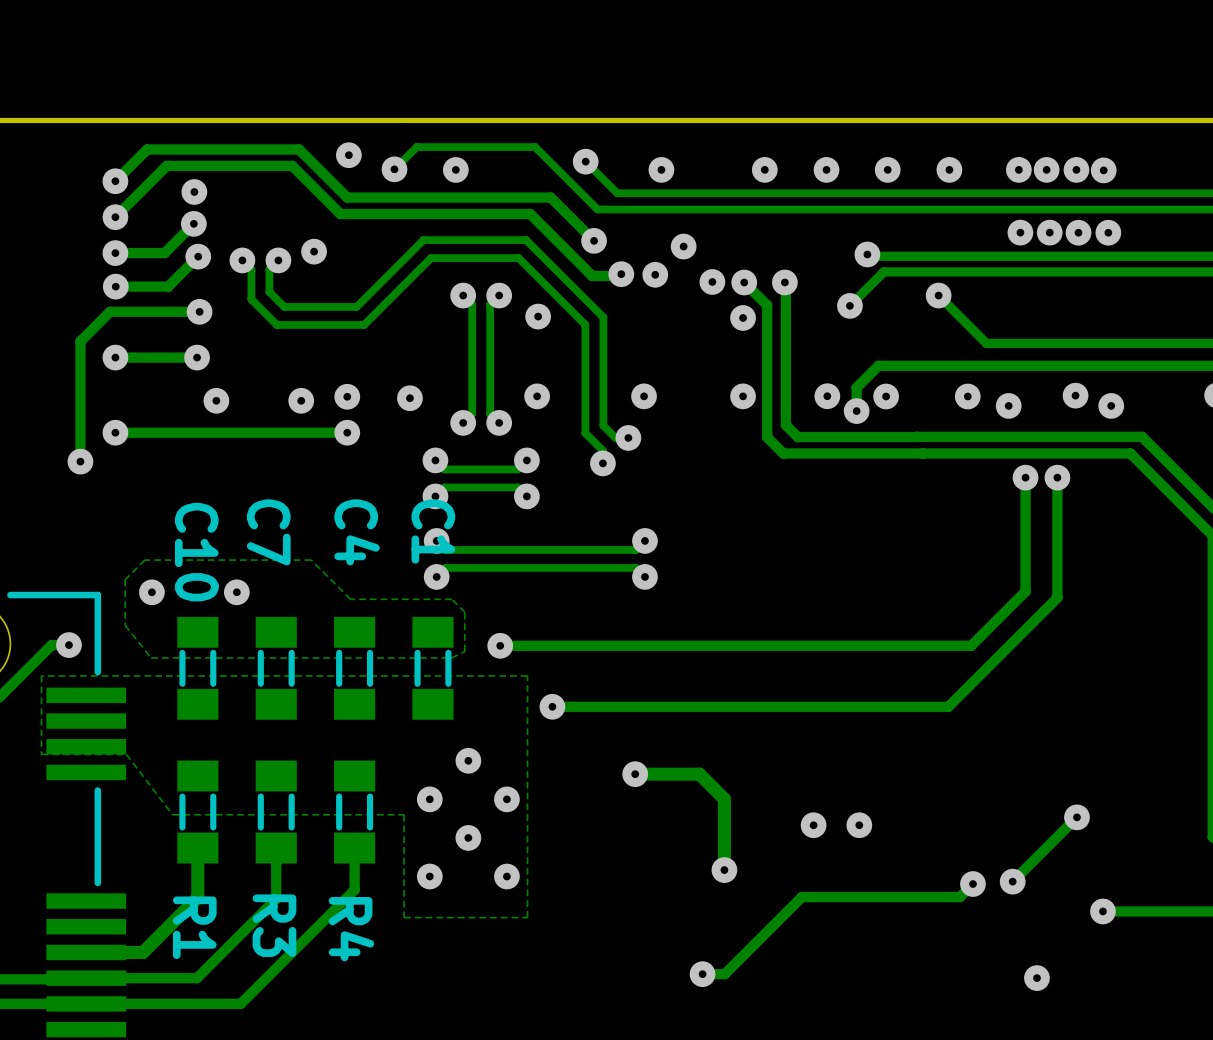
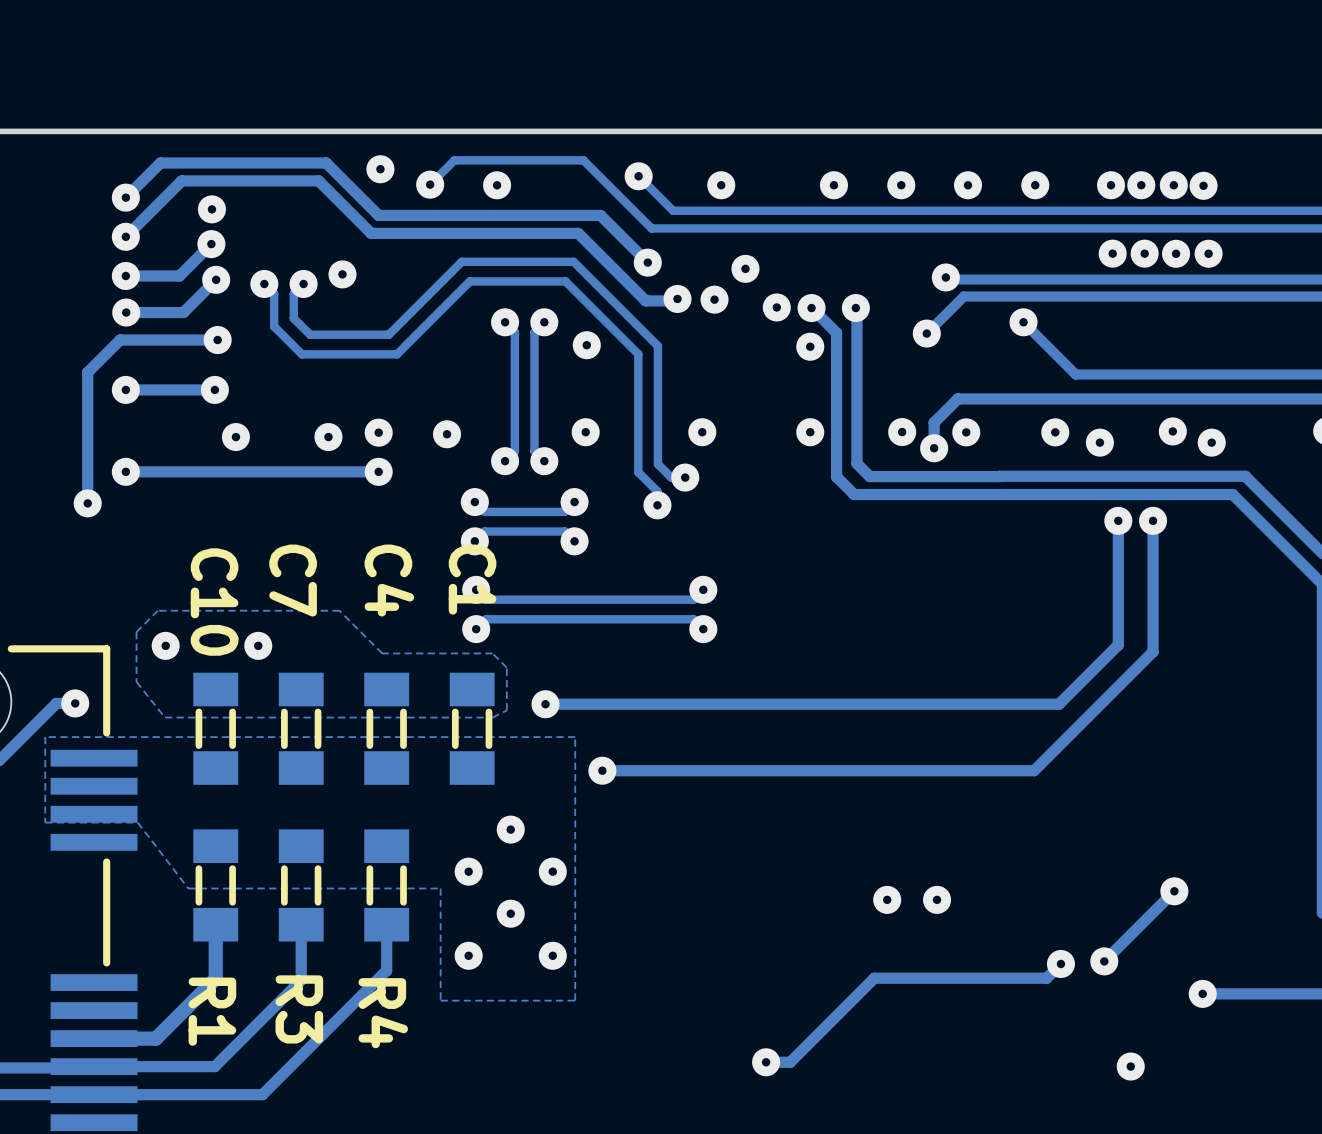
track: (635, 774) (699, 774) (724, 799) (724, 870) -> none
via: (635, 774) -> none
via: (724, 870) -> none

